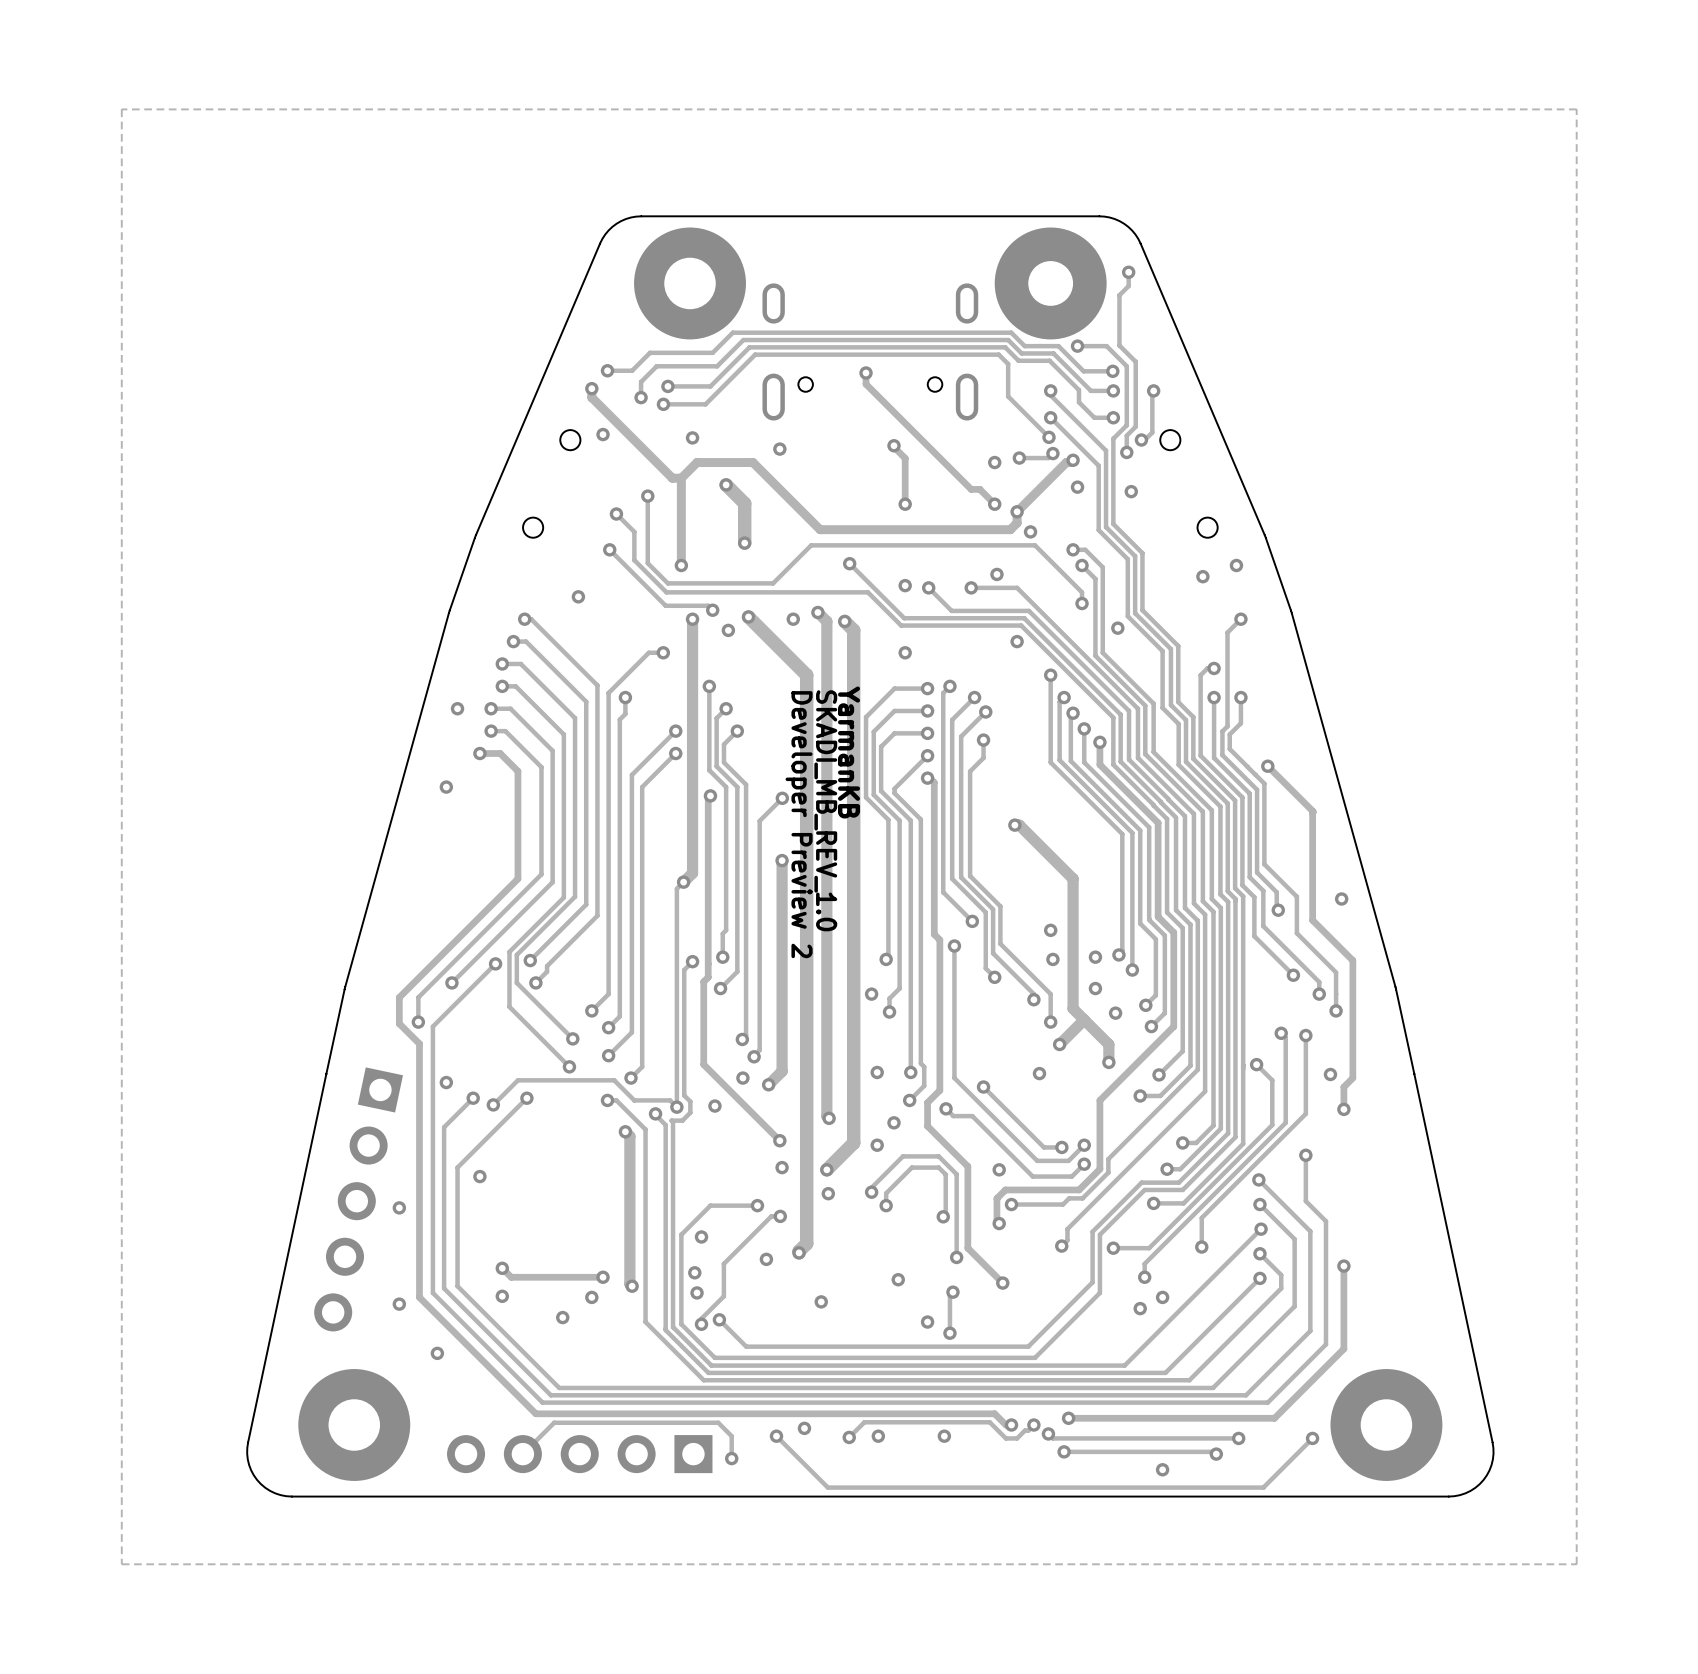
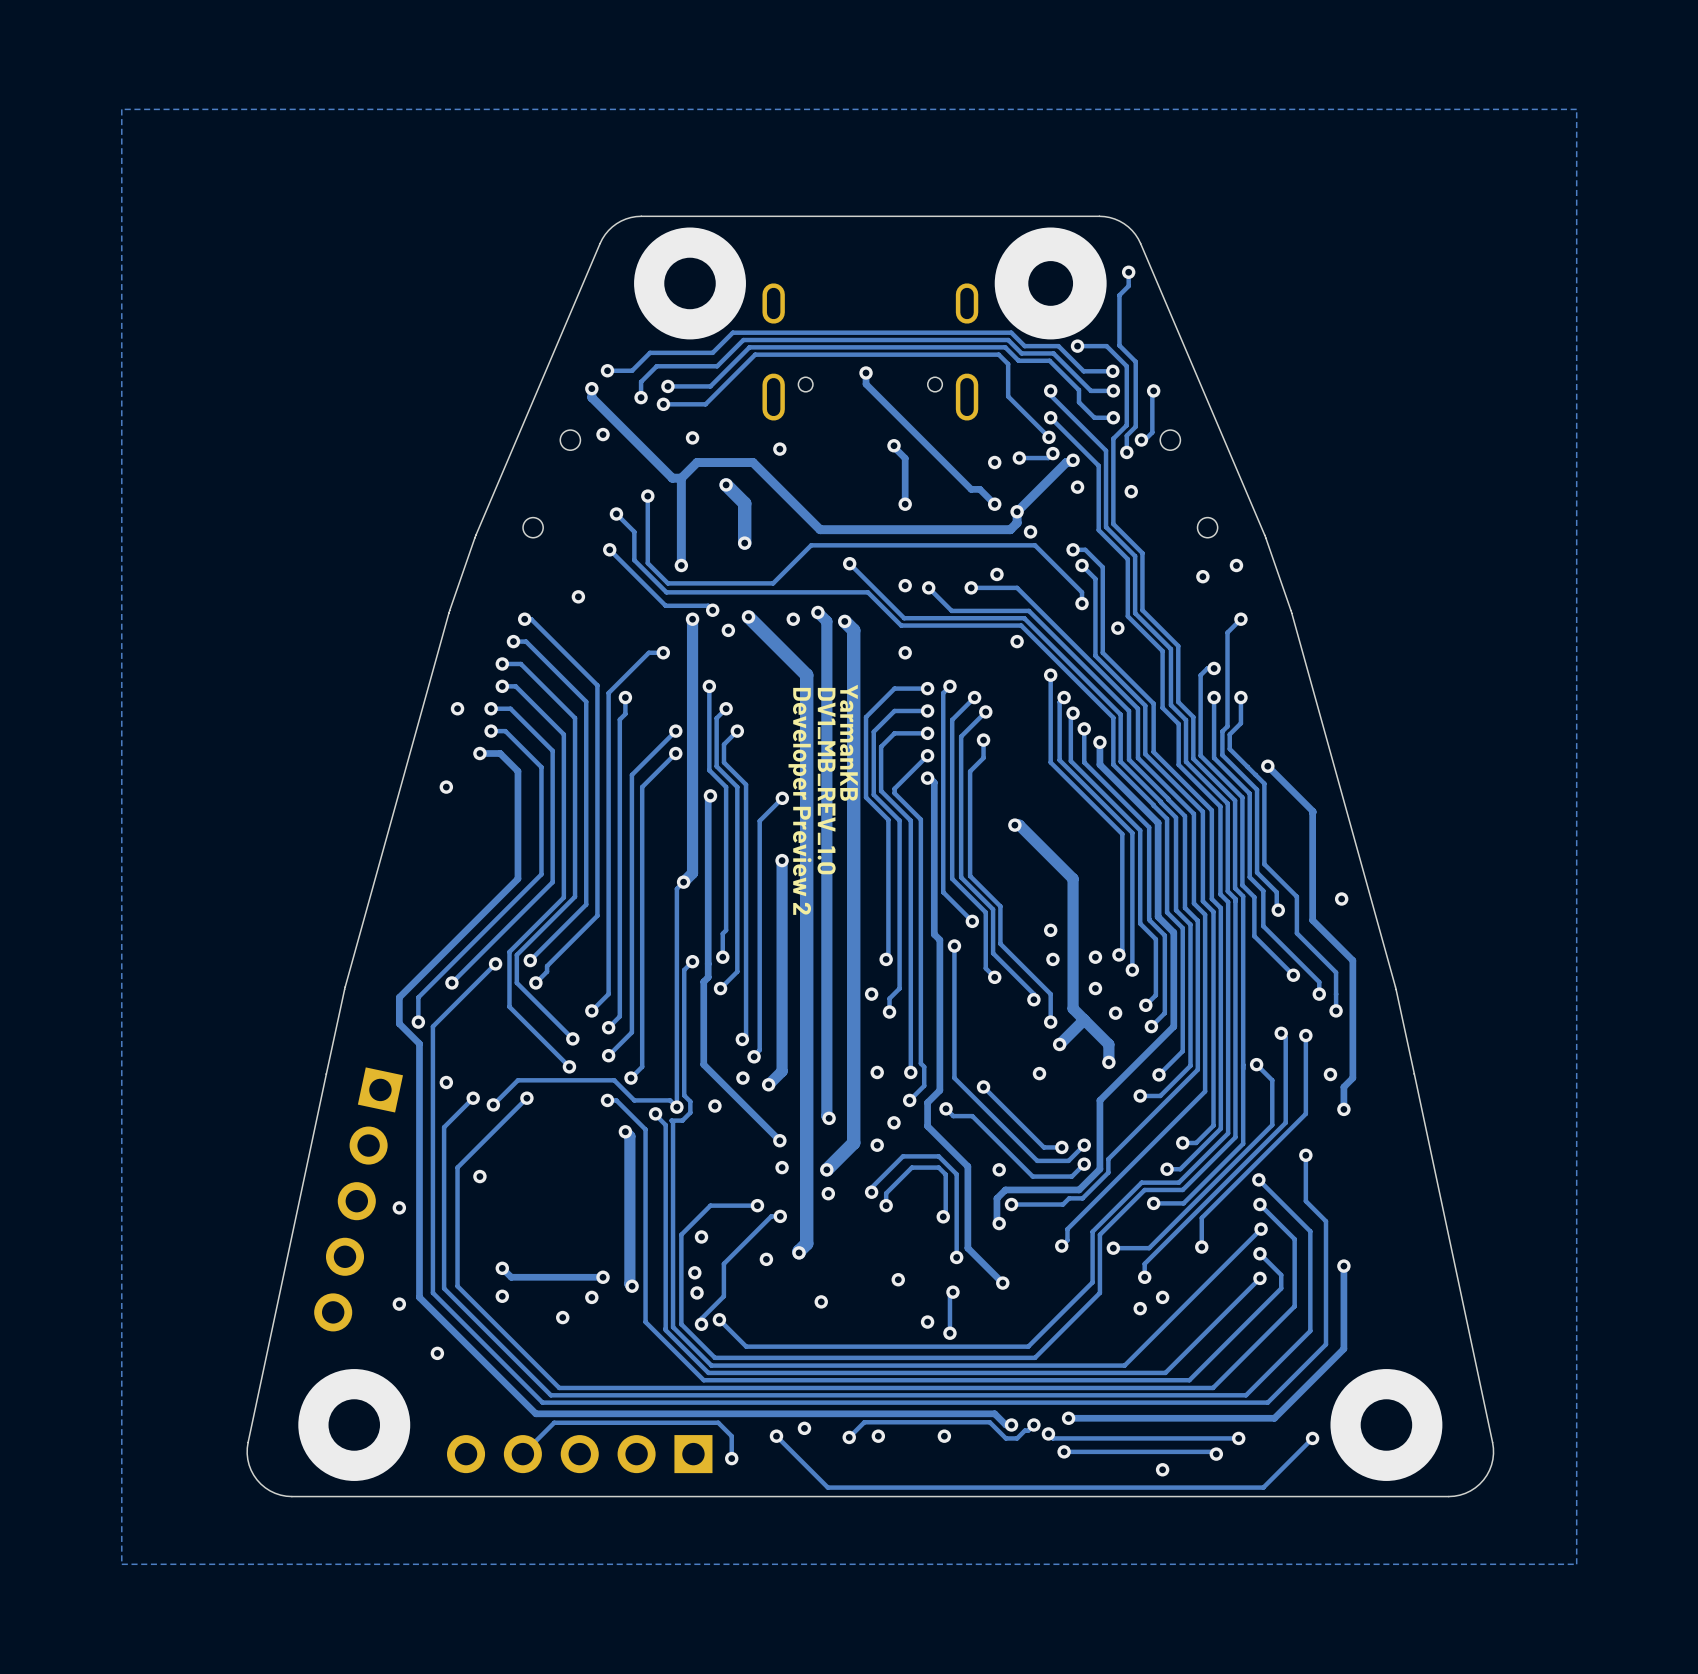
text: SKADI_MB_REV_1.0 (825, 810) -> DV1_MB_REV_1.0 (826, 781)

